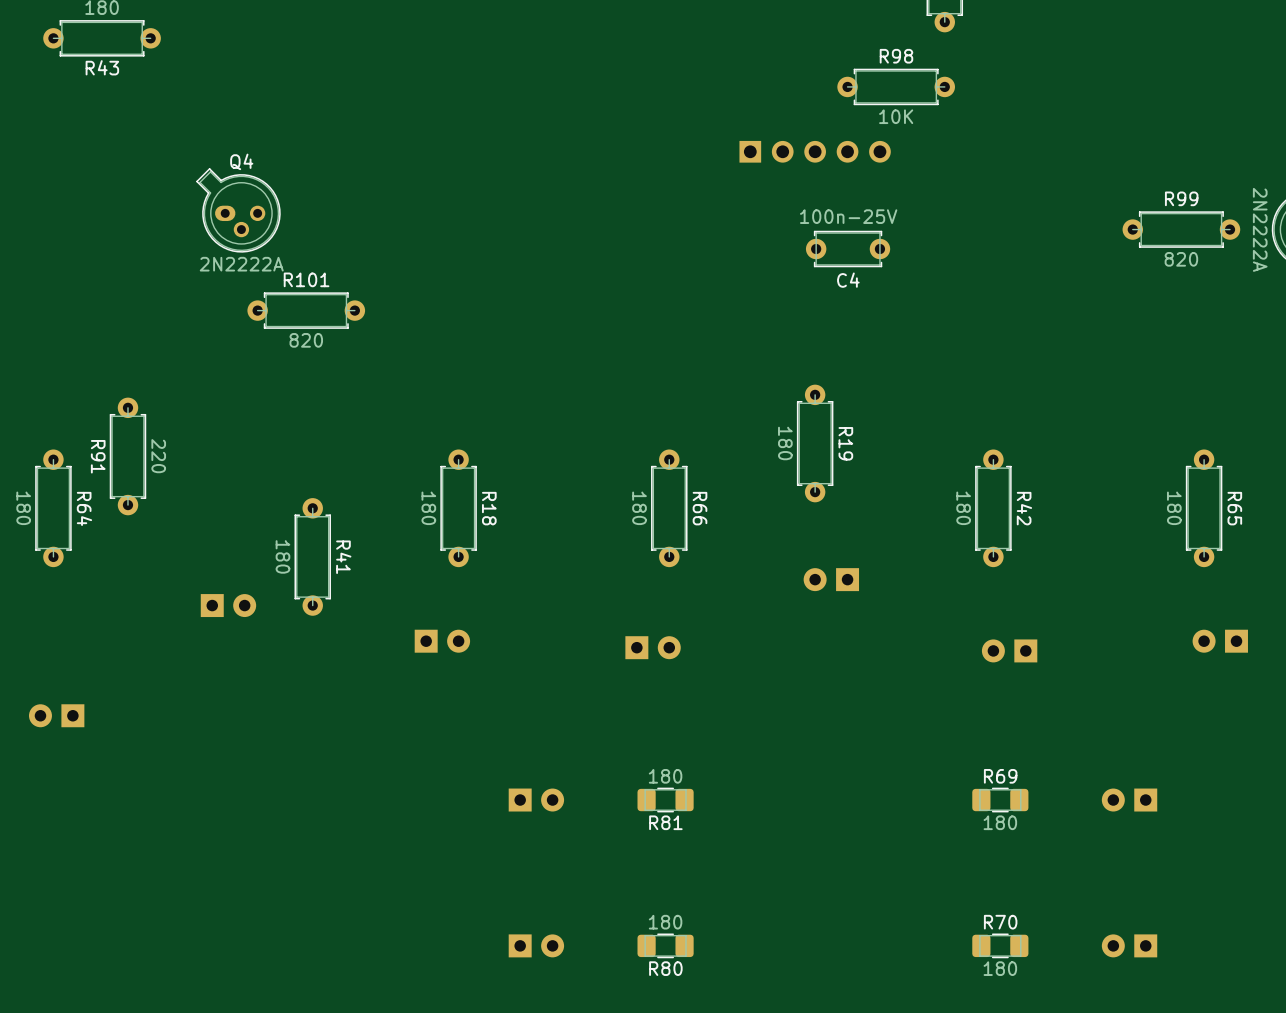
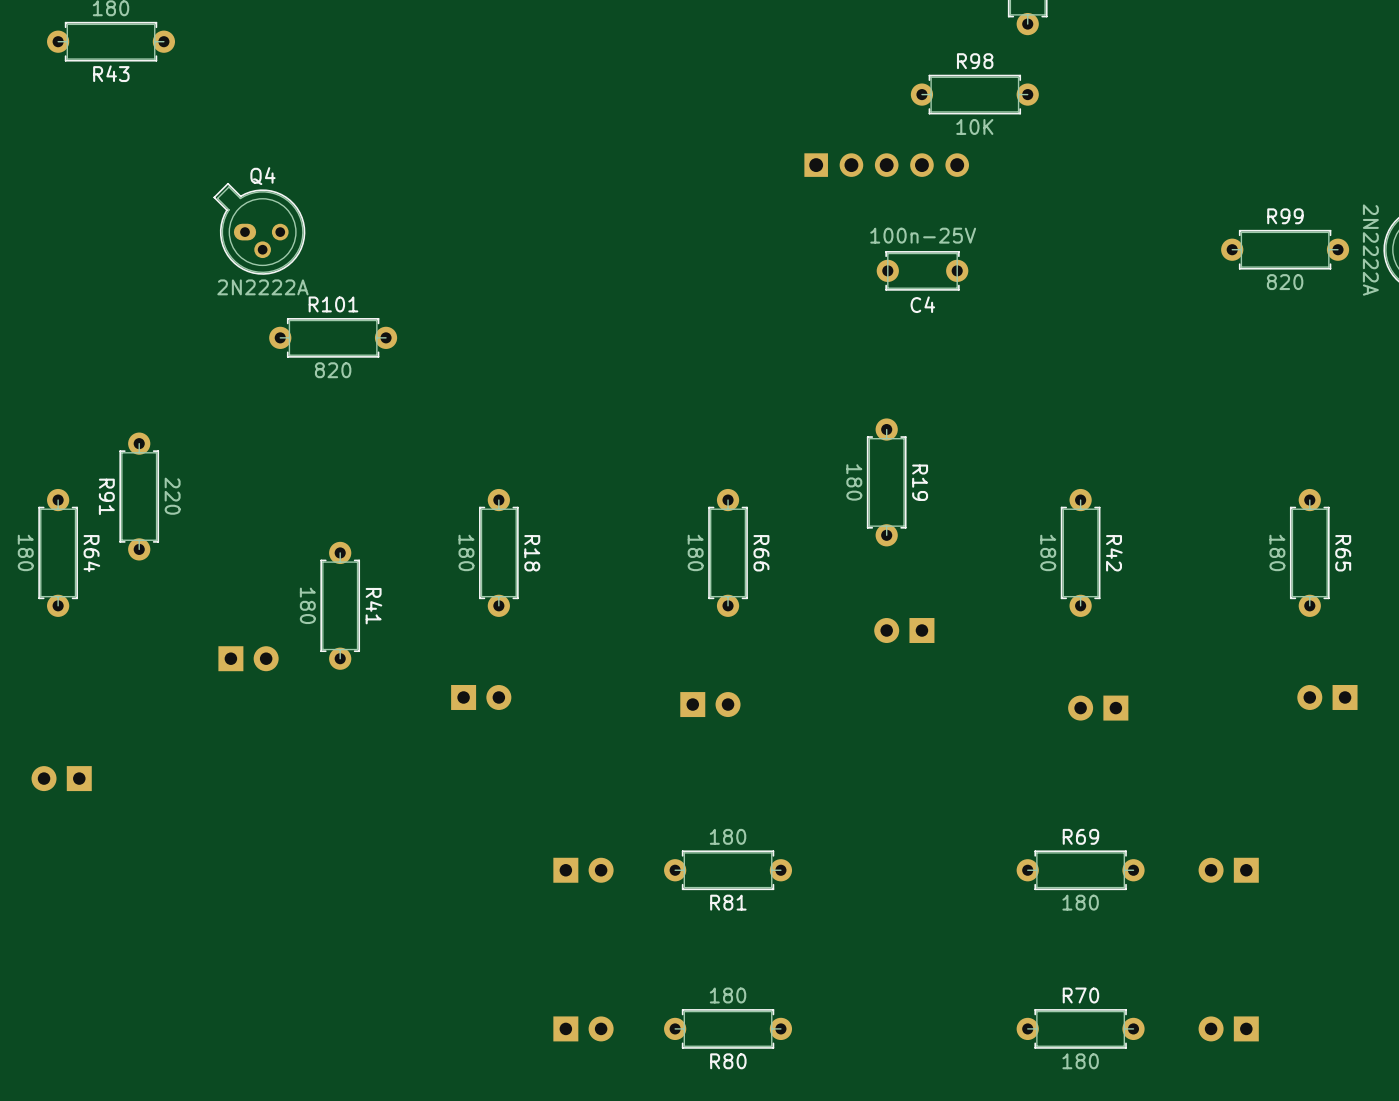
R81 footprint: [637, 787, 694, 813] -> [664, 850, 793, 891]
R69 footprint: [972, 787, 1029, 813] -> [1016, 850, 1145, 891]
R80 footprint: [637, 933, 694, 959] -> [664, 1009, 793, 1049]
R70 footprint: [972, 933, 1029, 959] -> [1016, 1009, 1145, 1049]

